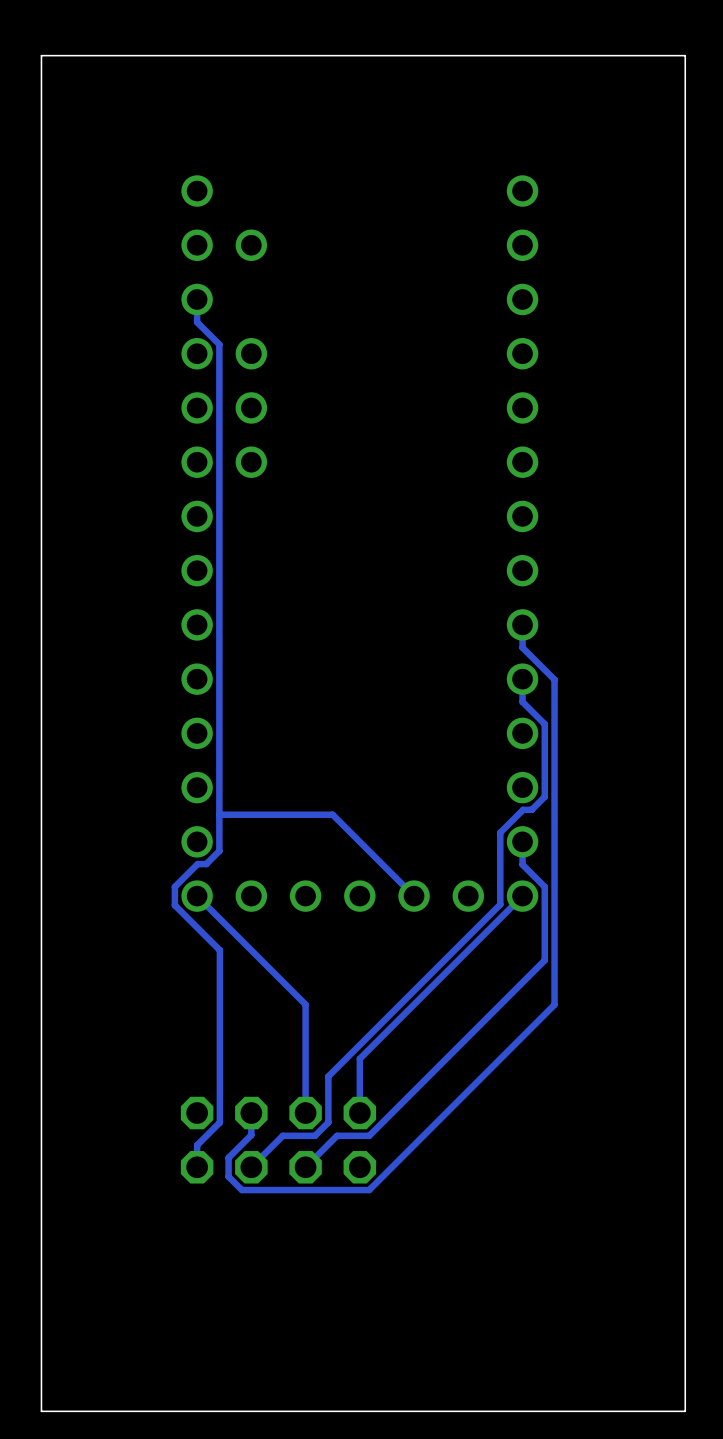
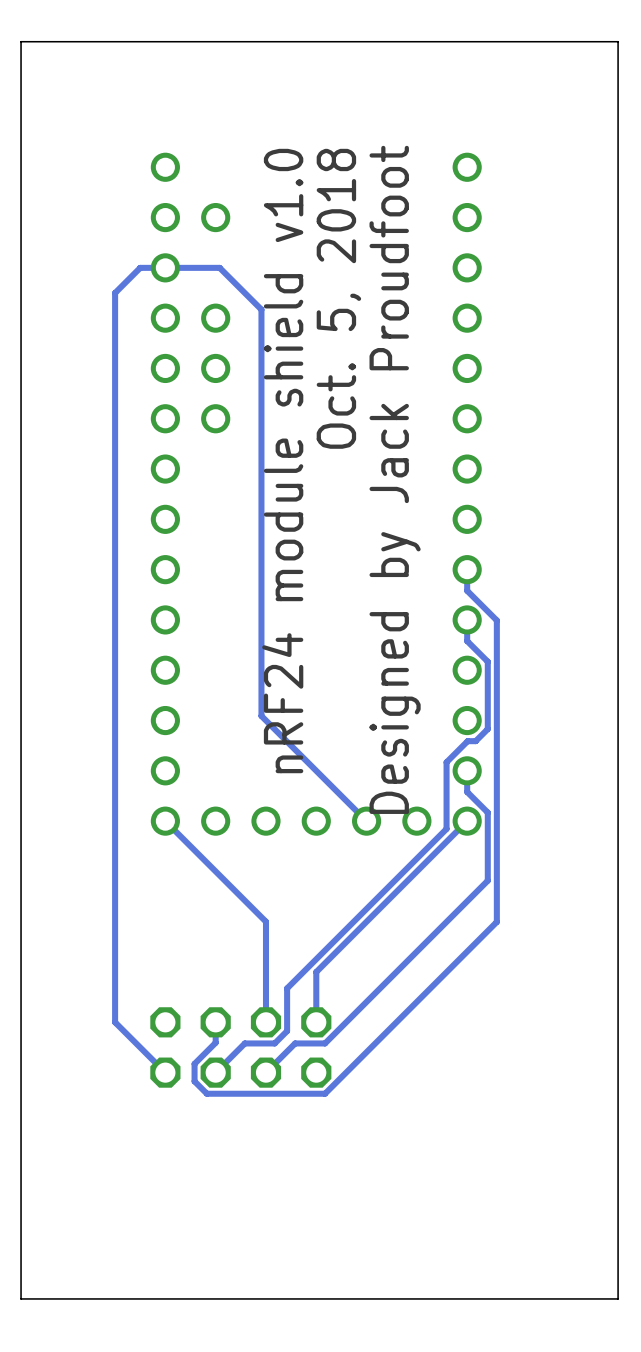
track: (197, 299) (197, 322) (219, 344) (219, 851) (206, 864) (197, 864) (174, 886) (174, 905) (219, 950) (219, 1122) (197, 1145) (197, 1167) -> none
text: none -> Oct. 5, 2018 (338, 298)
text: none -> nRF24 module shield v1.0 (282, 461)
text: none -> Designed by Jack Proudfoot (395, 479)
track: (332, 814) (219, 814) -> (291, 745) (261, 716) (261, 309) (219, 267) (140, 267) (115, 293) (115, 1022) (165, 1072)

